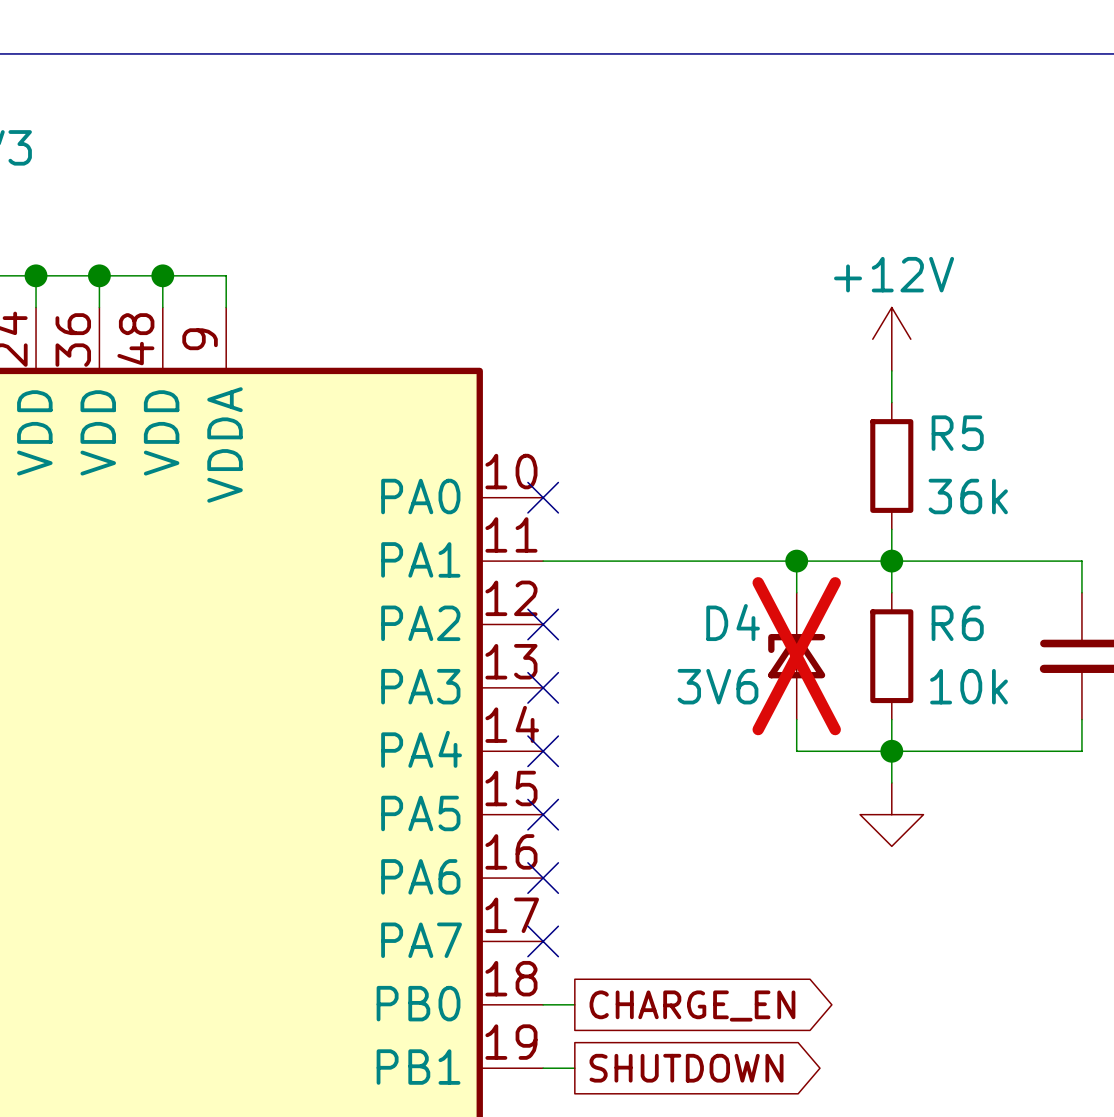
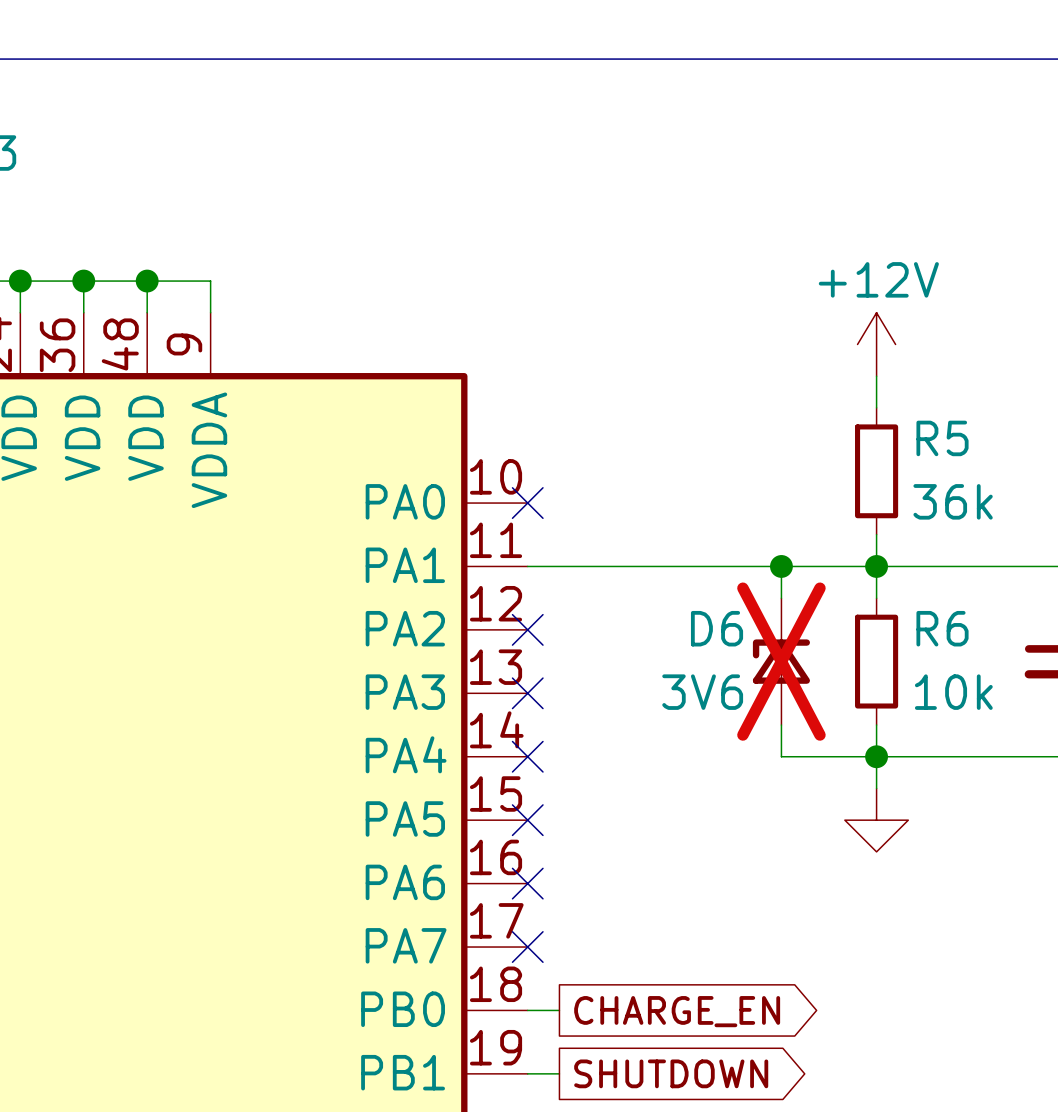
D4 name: D4 (733, 622) -> D6 (717, 628)

